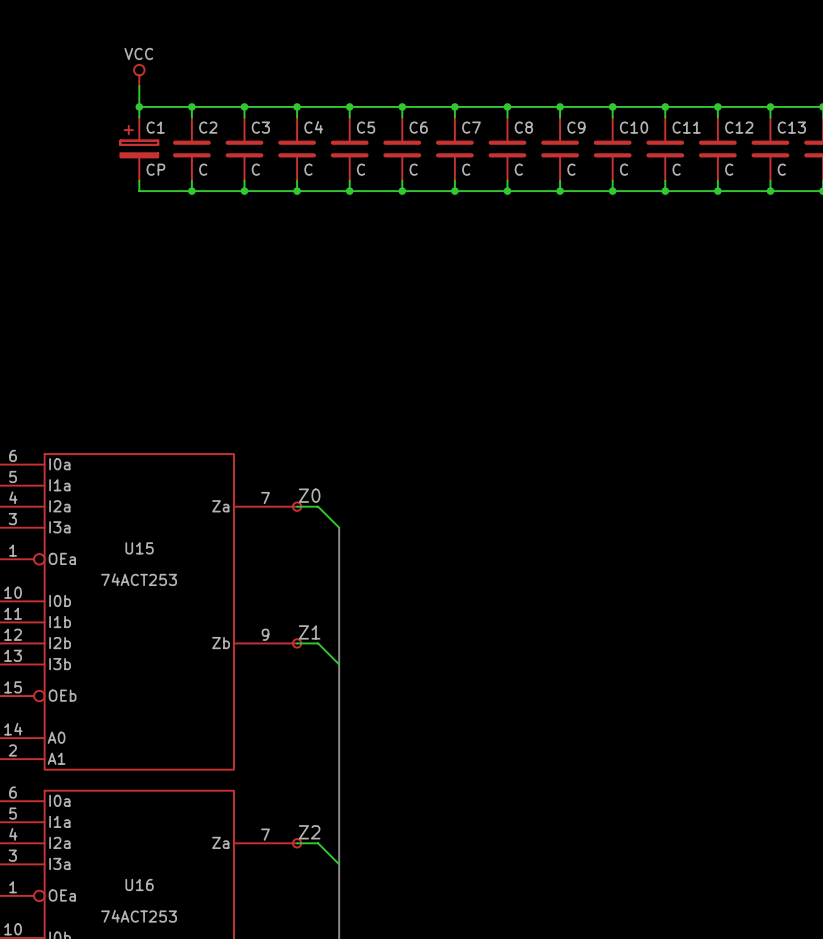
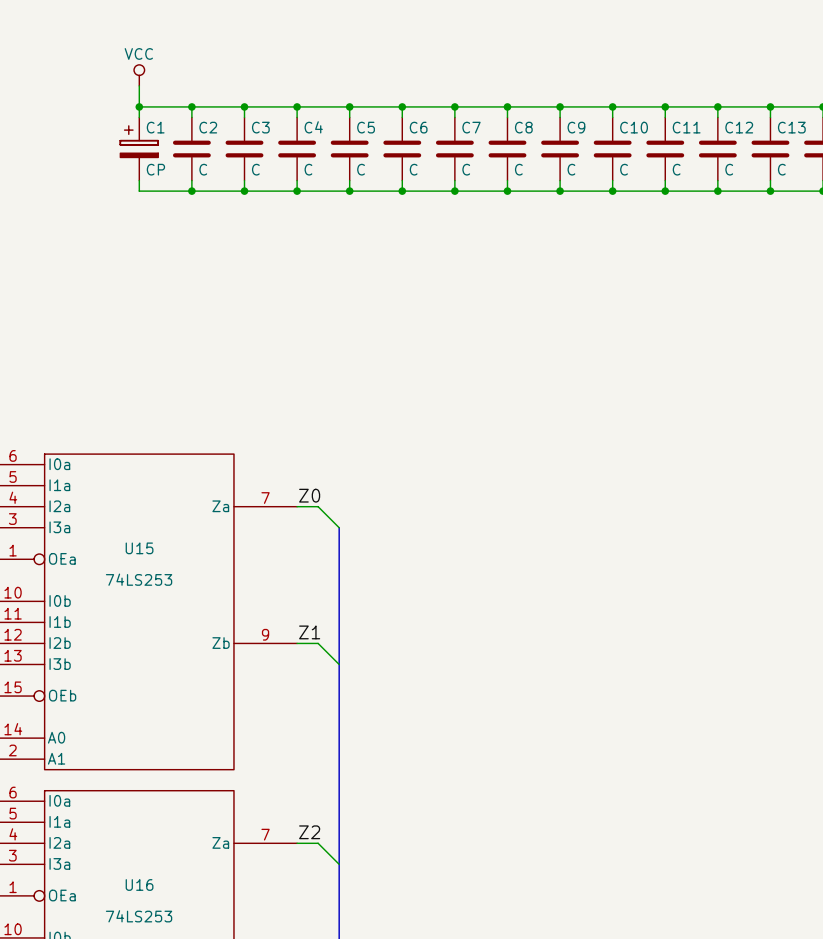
part: (297, 506) -> none
U15 value: 74ACT253 (139, 579) -> 74LS253 (139, 579)
part: (297, 643) -> none
part: (297, 843) -> none
U16 value: 74ACT253 (139, 916) -> 74LS253 (139, 916)

